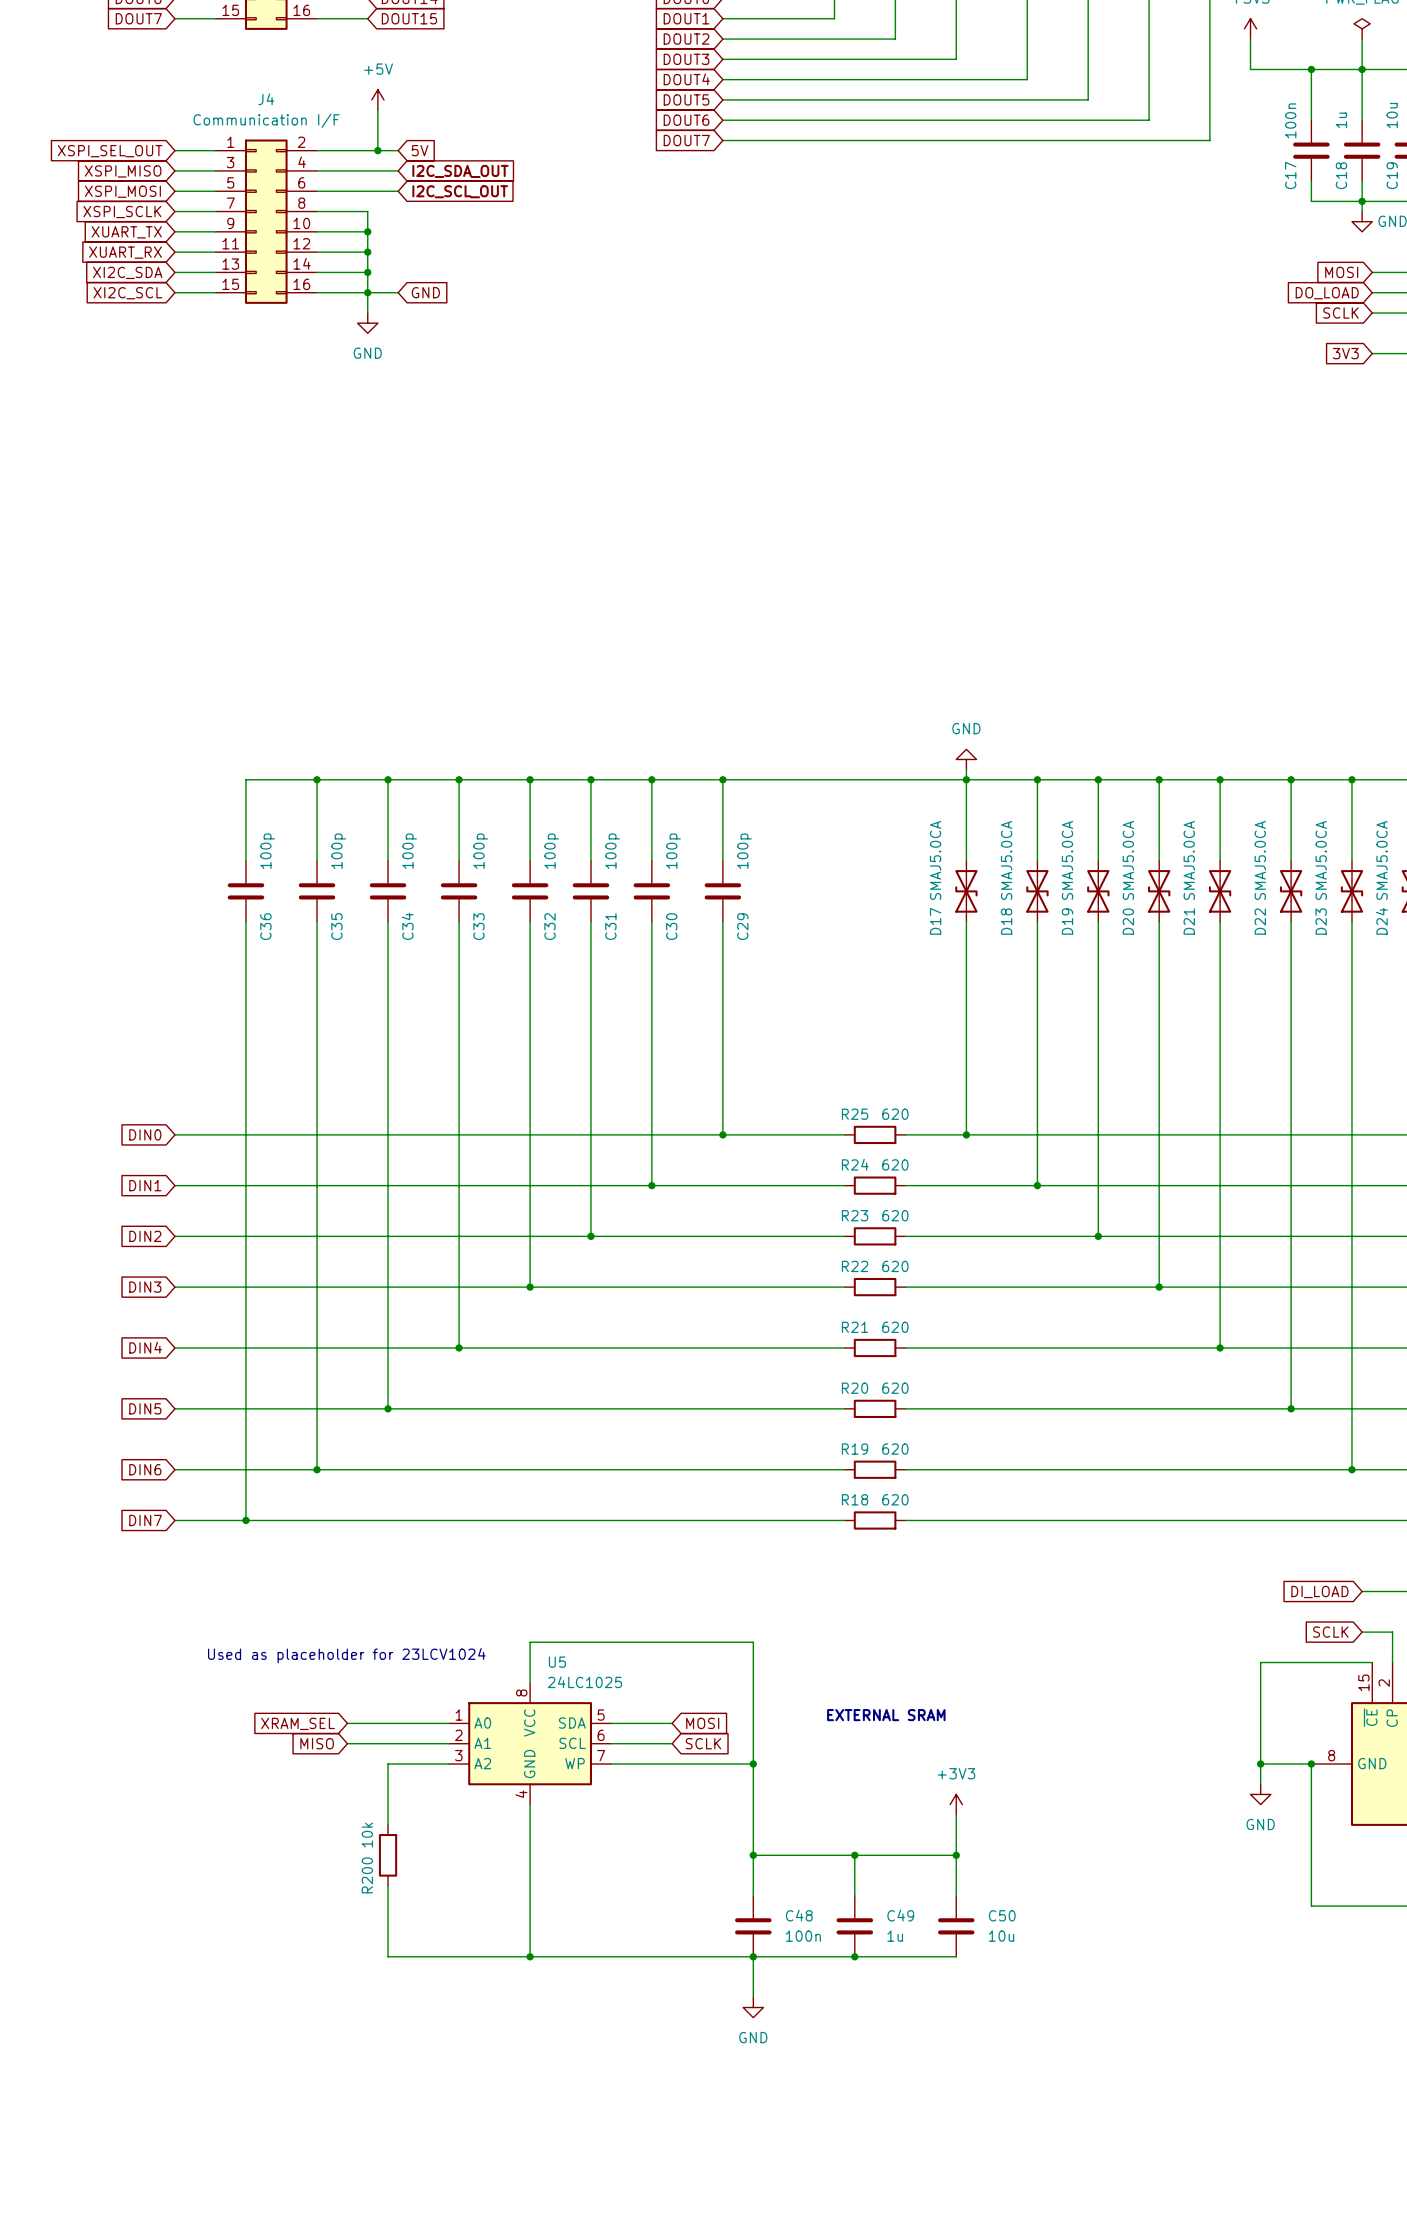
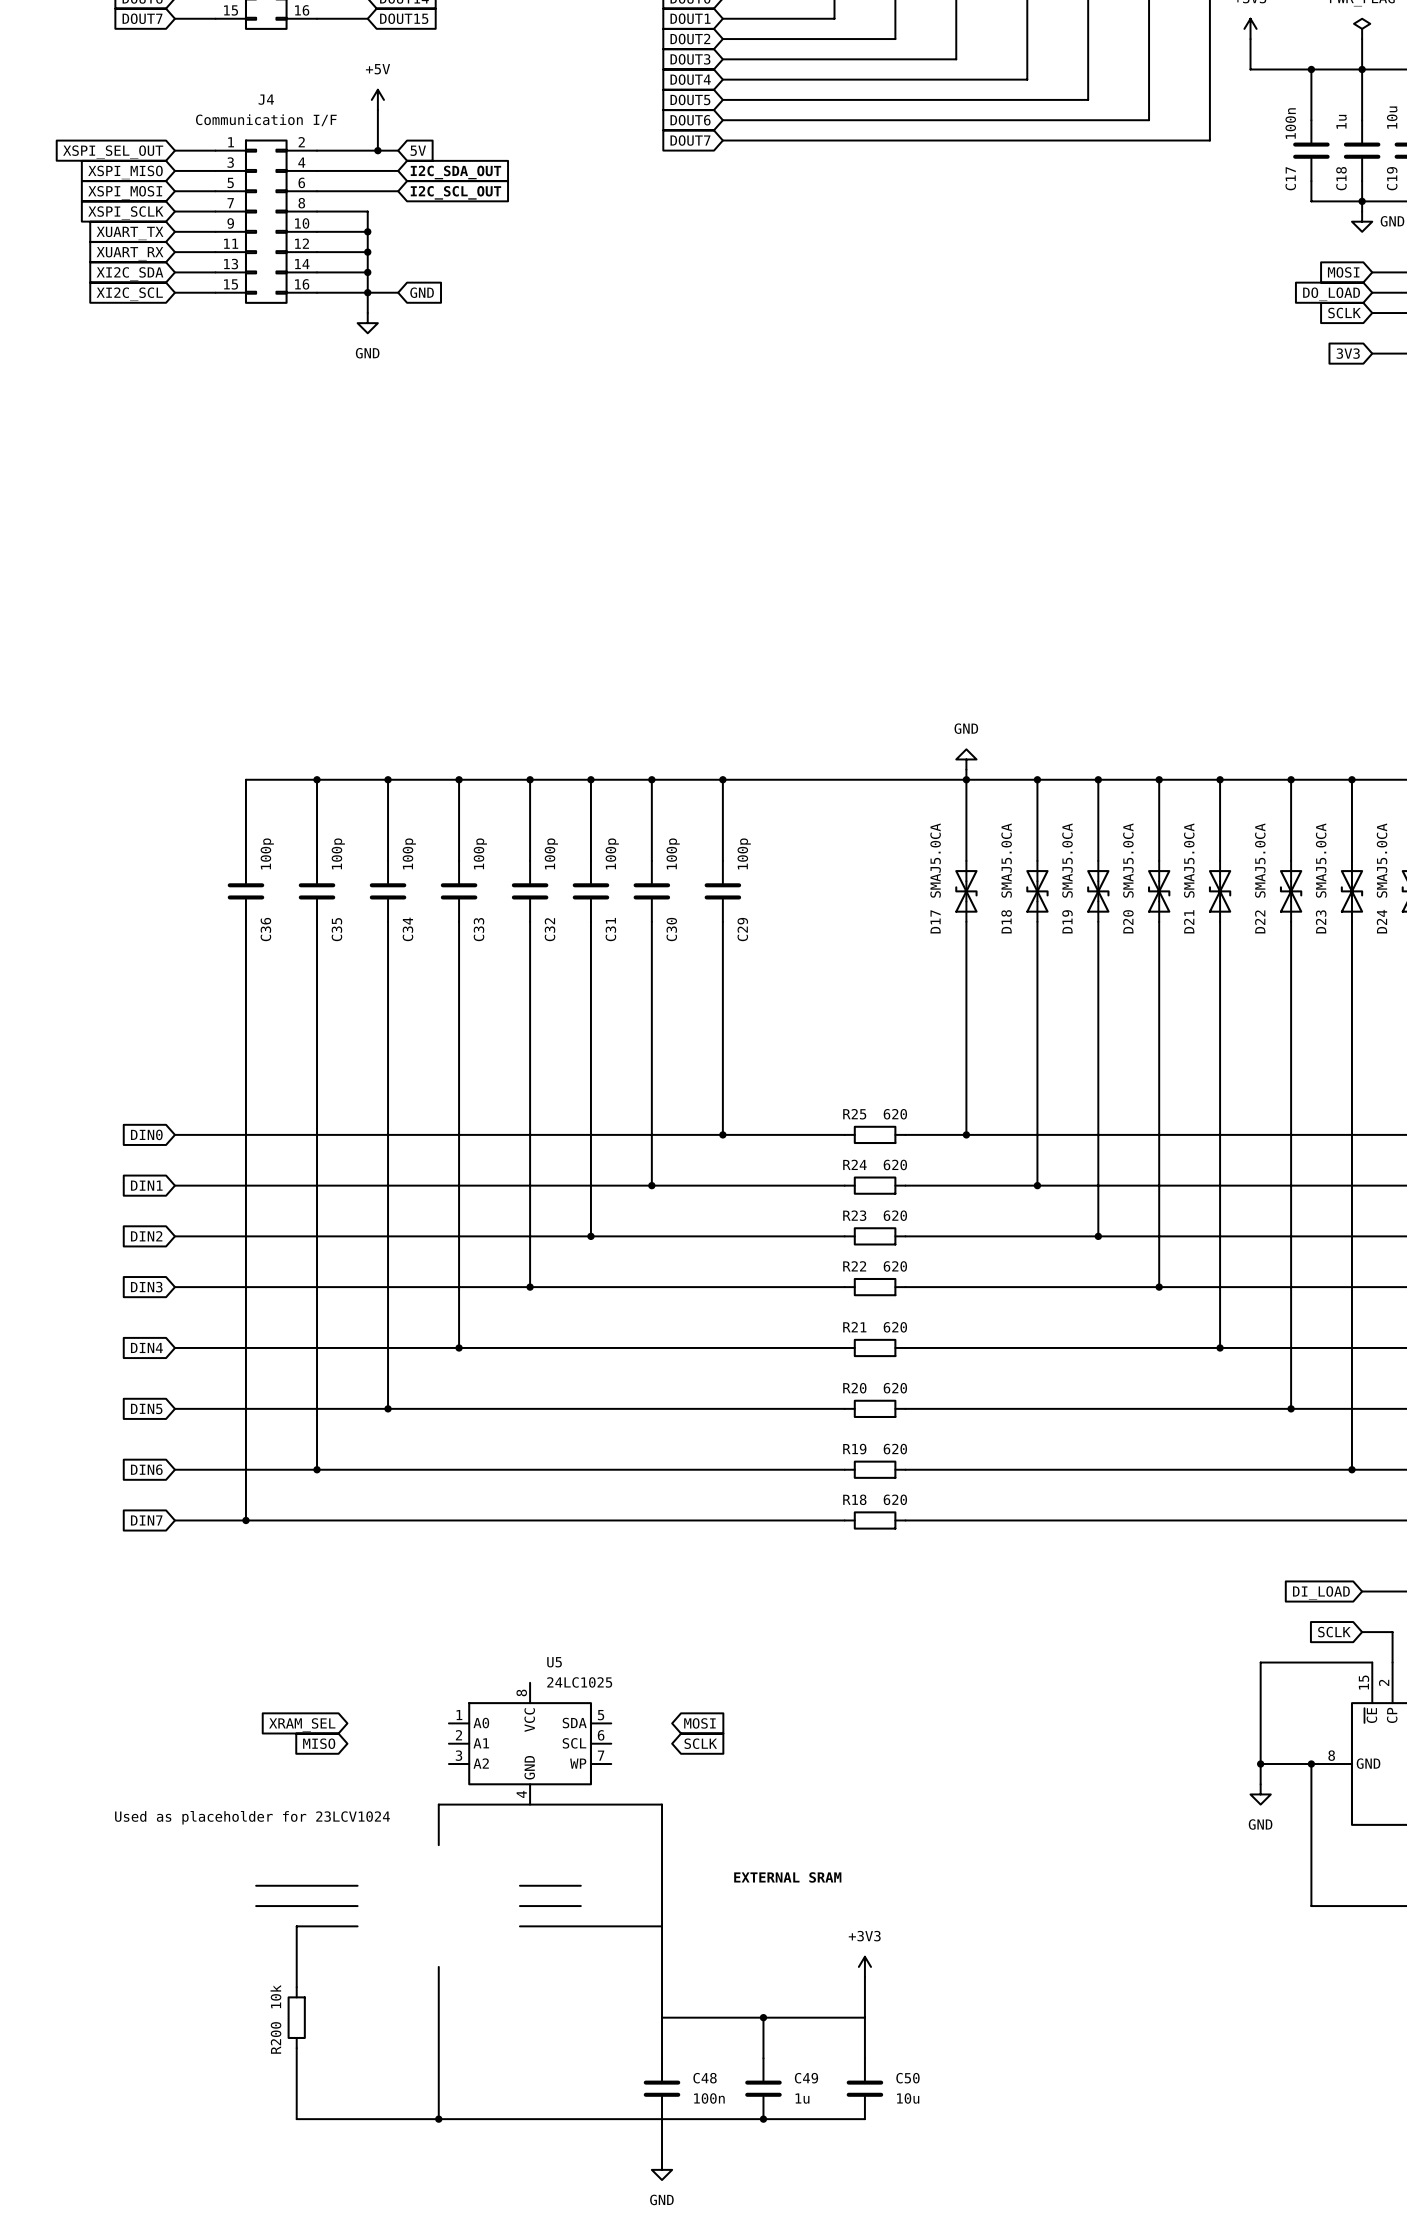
text position: Used as placeholder for 23LCV1024 (346, 1655) -> Used as placeholder for 23LCV1024 (252, 1817)
wire: (530, 1682) (530, 1642) (753, 1642) (753, 1895) -> (438, 1845) (438, 1804) (662, 1804) (662, 2058)
text position: EXTERNAL SRAM (886, 1715) -> EXTERNAL SRAM (787, 1877)
wire: (347, 1723) (448, 1723) -> (256, 1885) (357, 1885)
wire: (611, 1723) (672, 1723) -> (519, 1885) (580, 1885)
wire: (347, 1743) (448, 1743) -> (256, 1906) (357, 1906)
wire: (611, 1743) (672, 1743) -> (519, 1906) (580, 1906)
wire: (448, 1764) (388, 1764) (388, 1824) -> (357, 1926) (296, 1926) (296, 1987)
wire: (611, 1764) (753, 1764) -> (519, 1926) (662, 1926)
junction: (753, 1764) -> none
wire: (530, 1804) (530, 1956) -> (438, 1966) (438, 2119)
power symbol position: +3V3 (956, 1804) -> +3V3 (864, 1966)
wire: (956, 1814) (956, 1895) -> (864, 1977) (864, 2058)
R200 position: (388, 1855) -> (296, 2017)
wire: (753, 1855) (956, 1855) -> (662, 2017) (864, 2017)
junction: (753, 1855) -> none
wire: (854, 1855) (854, 1895) -> (763, 2017) (763, 2058)
junction: (854, 1855) -> none
junction: (956, 1855) -> none
wire: (388, 1885) (388, 1956) (956, 1956) -> (296, 2048) (296, 2119) (864, 2119)
C48 position: (753, 1926) -> (662, 2088)
C49 position: (854, 1926) -> (763, 2088)
C50 position: (956, 1926) -> (864, 2088)
junction: (530, 1956) -> none
wire: (753, 1956) (753, 1997) -> (662, 2119) (662, 2159)
junction: (753, 1956) -> none
junction: (854, 1956) -> none
power symbol position: GND (753, 2007) -> GND (662, 2169)
junction: none -> (763, 2017)
junction: none -> (438, 2119)
junction: none -> (763, 2119)

